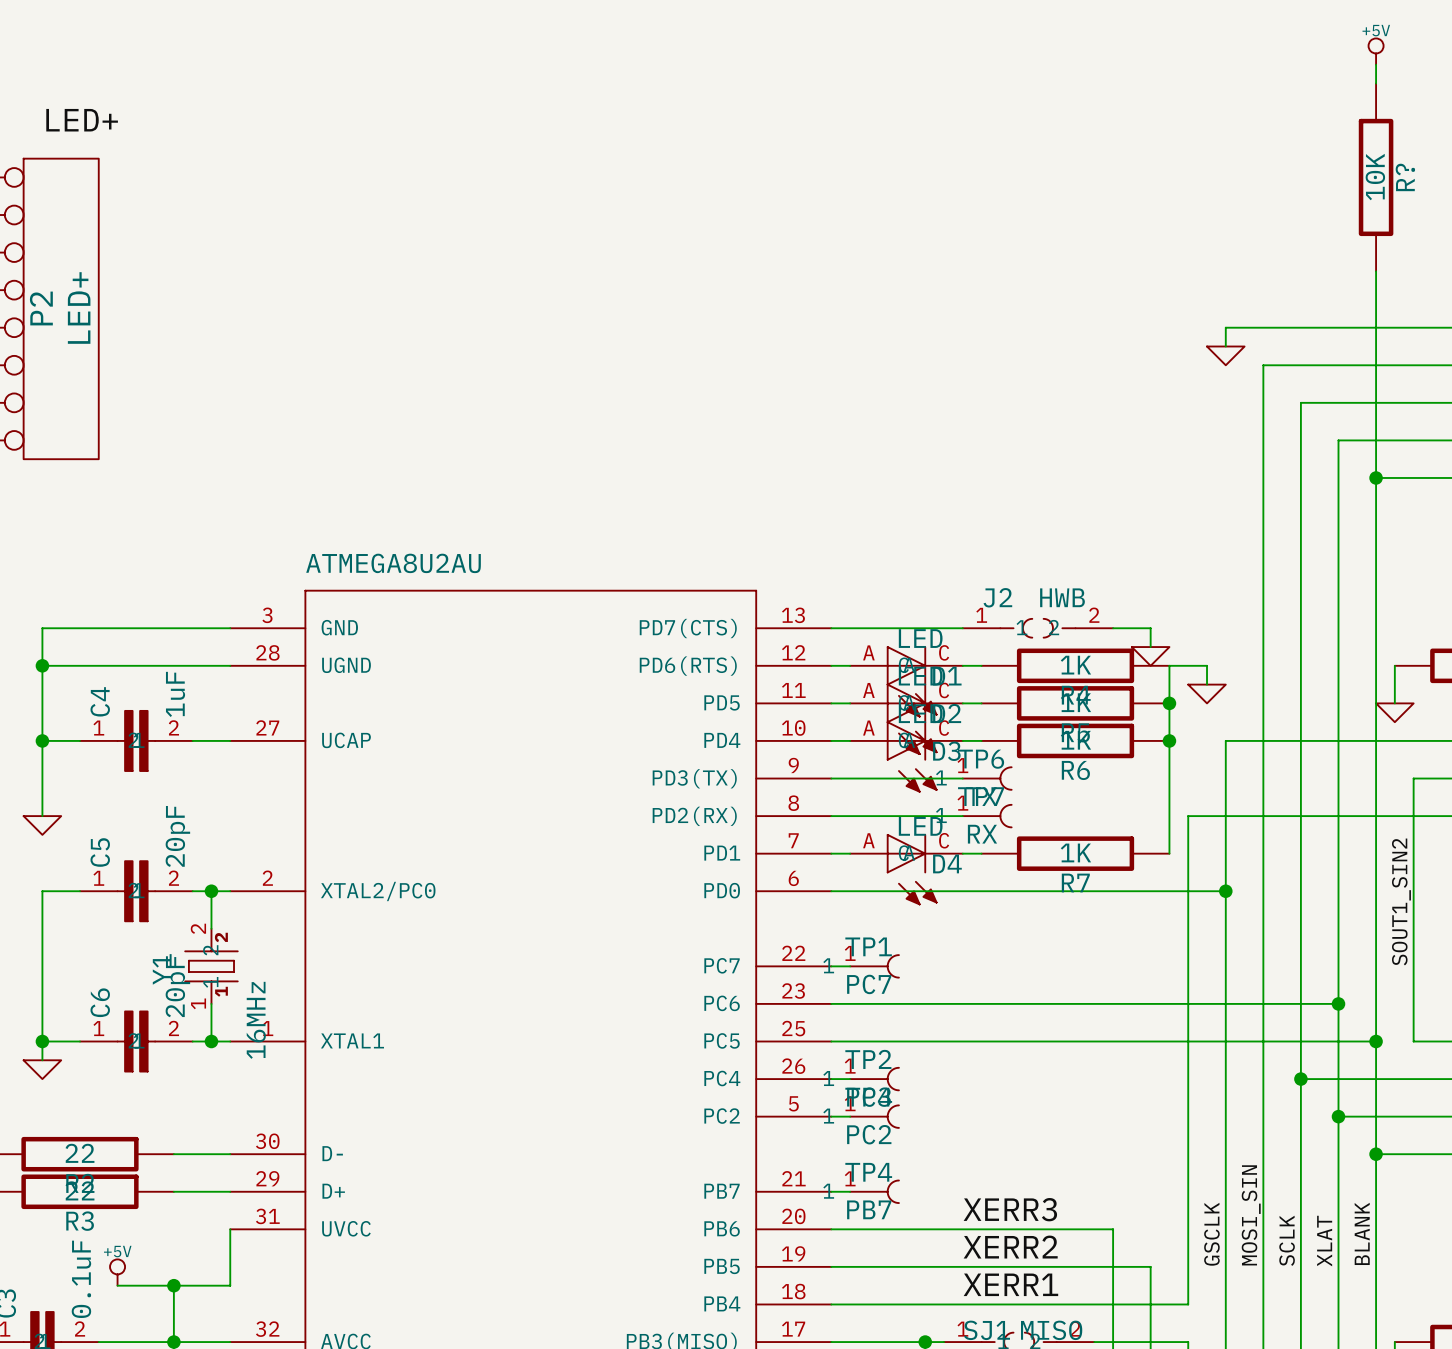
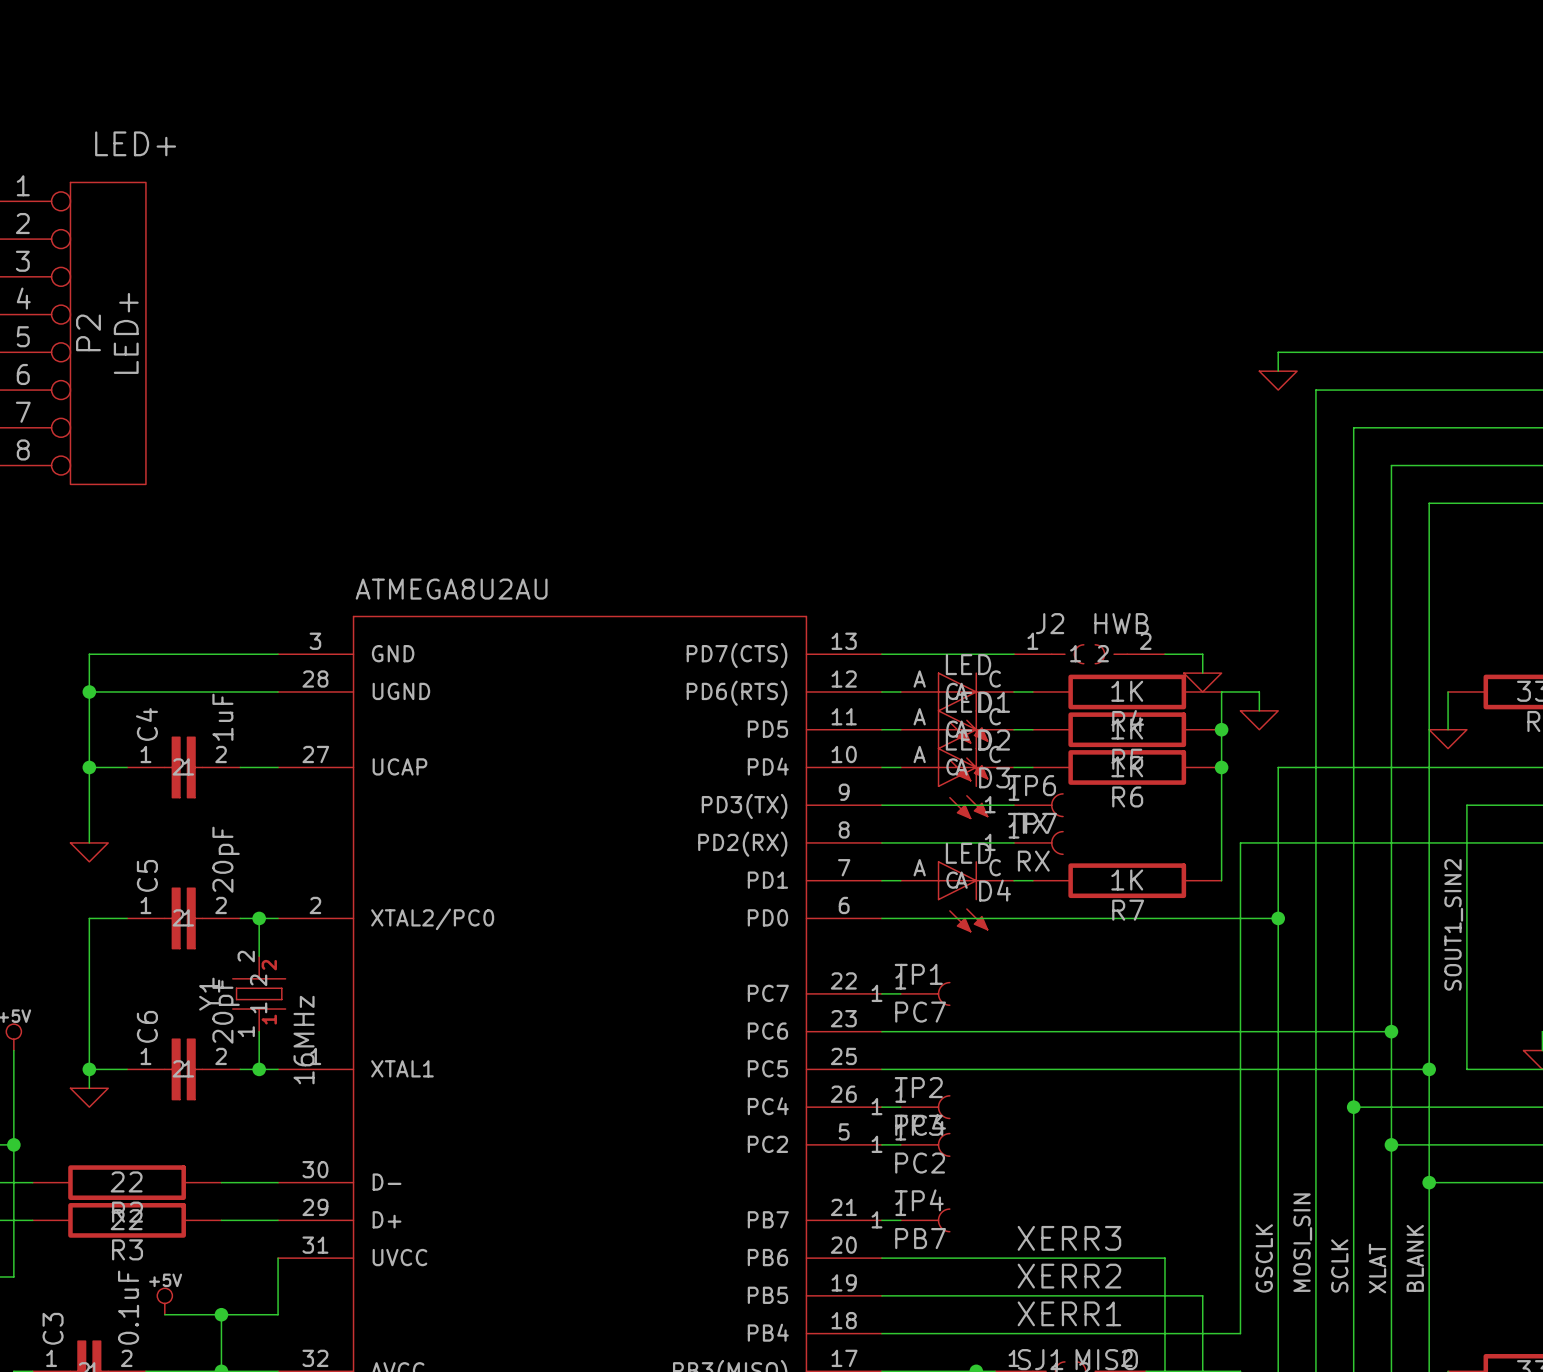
power symbol: +5V (1376, 51) -> none
wire: (1376, 64) (1376, 83) -> none
R?: 10K (1376, 177) -> none
wire: (1376, 271) (1376, 477) -> none
junction: (1376, 477) -> none

